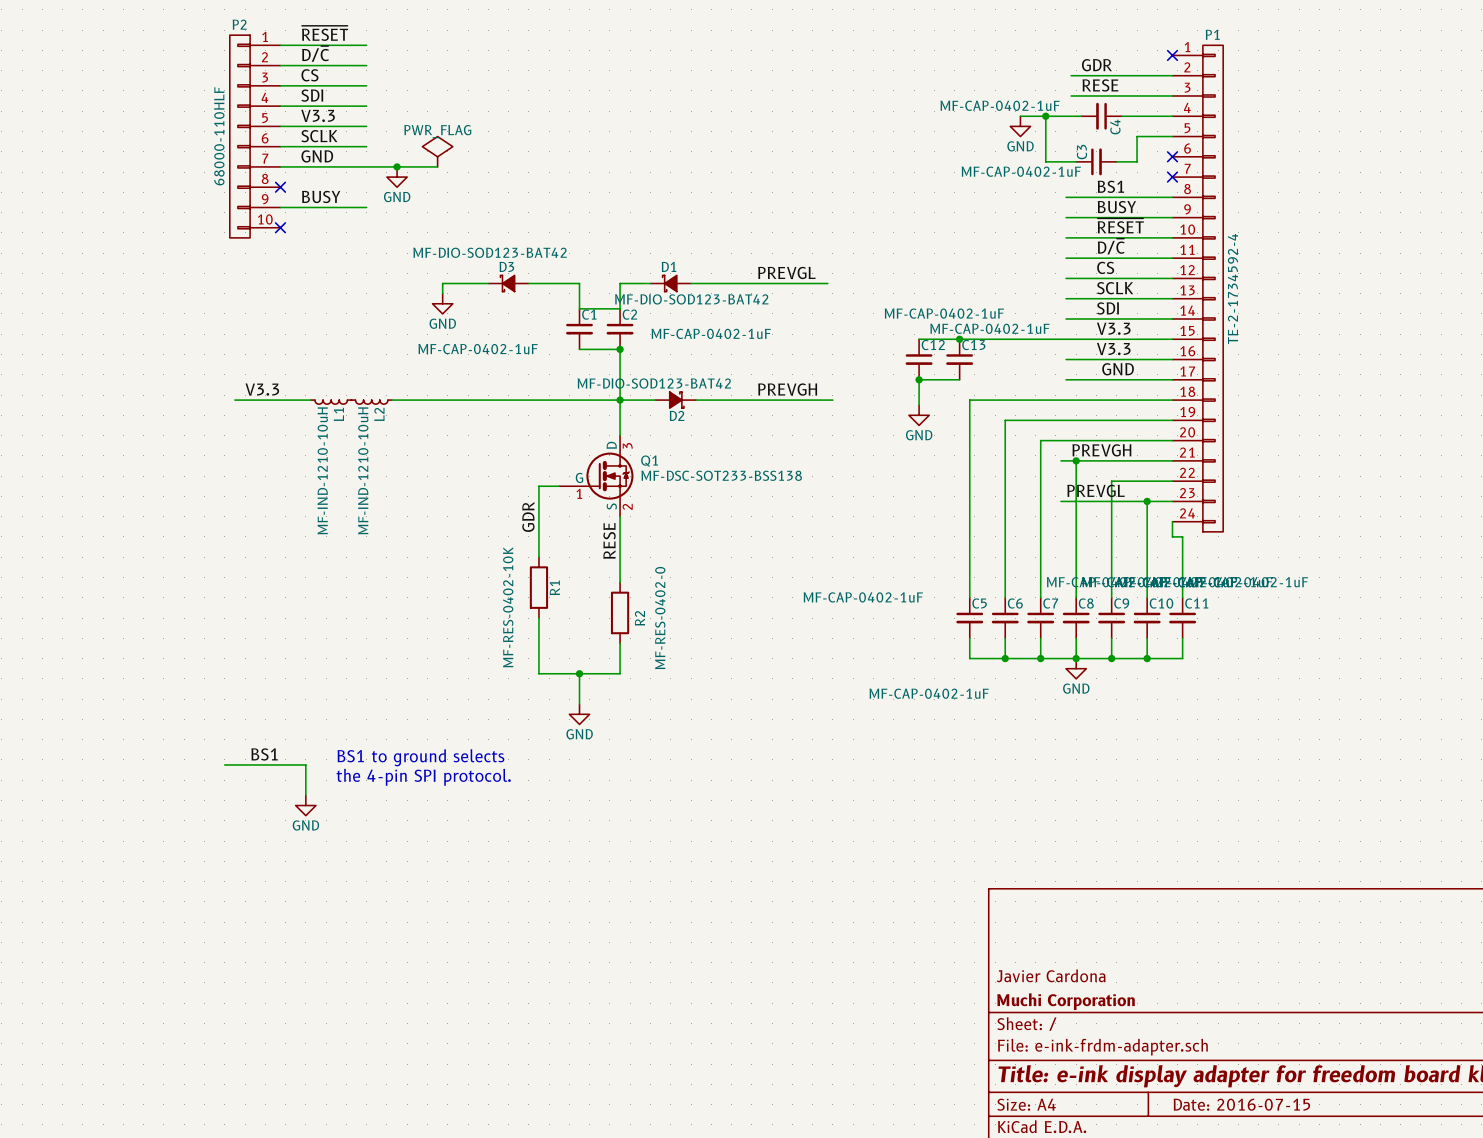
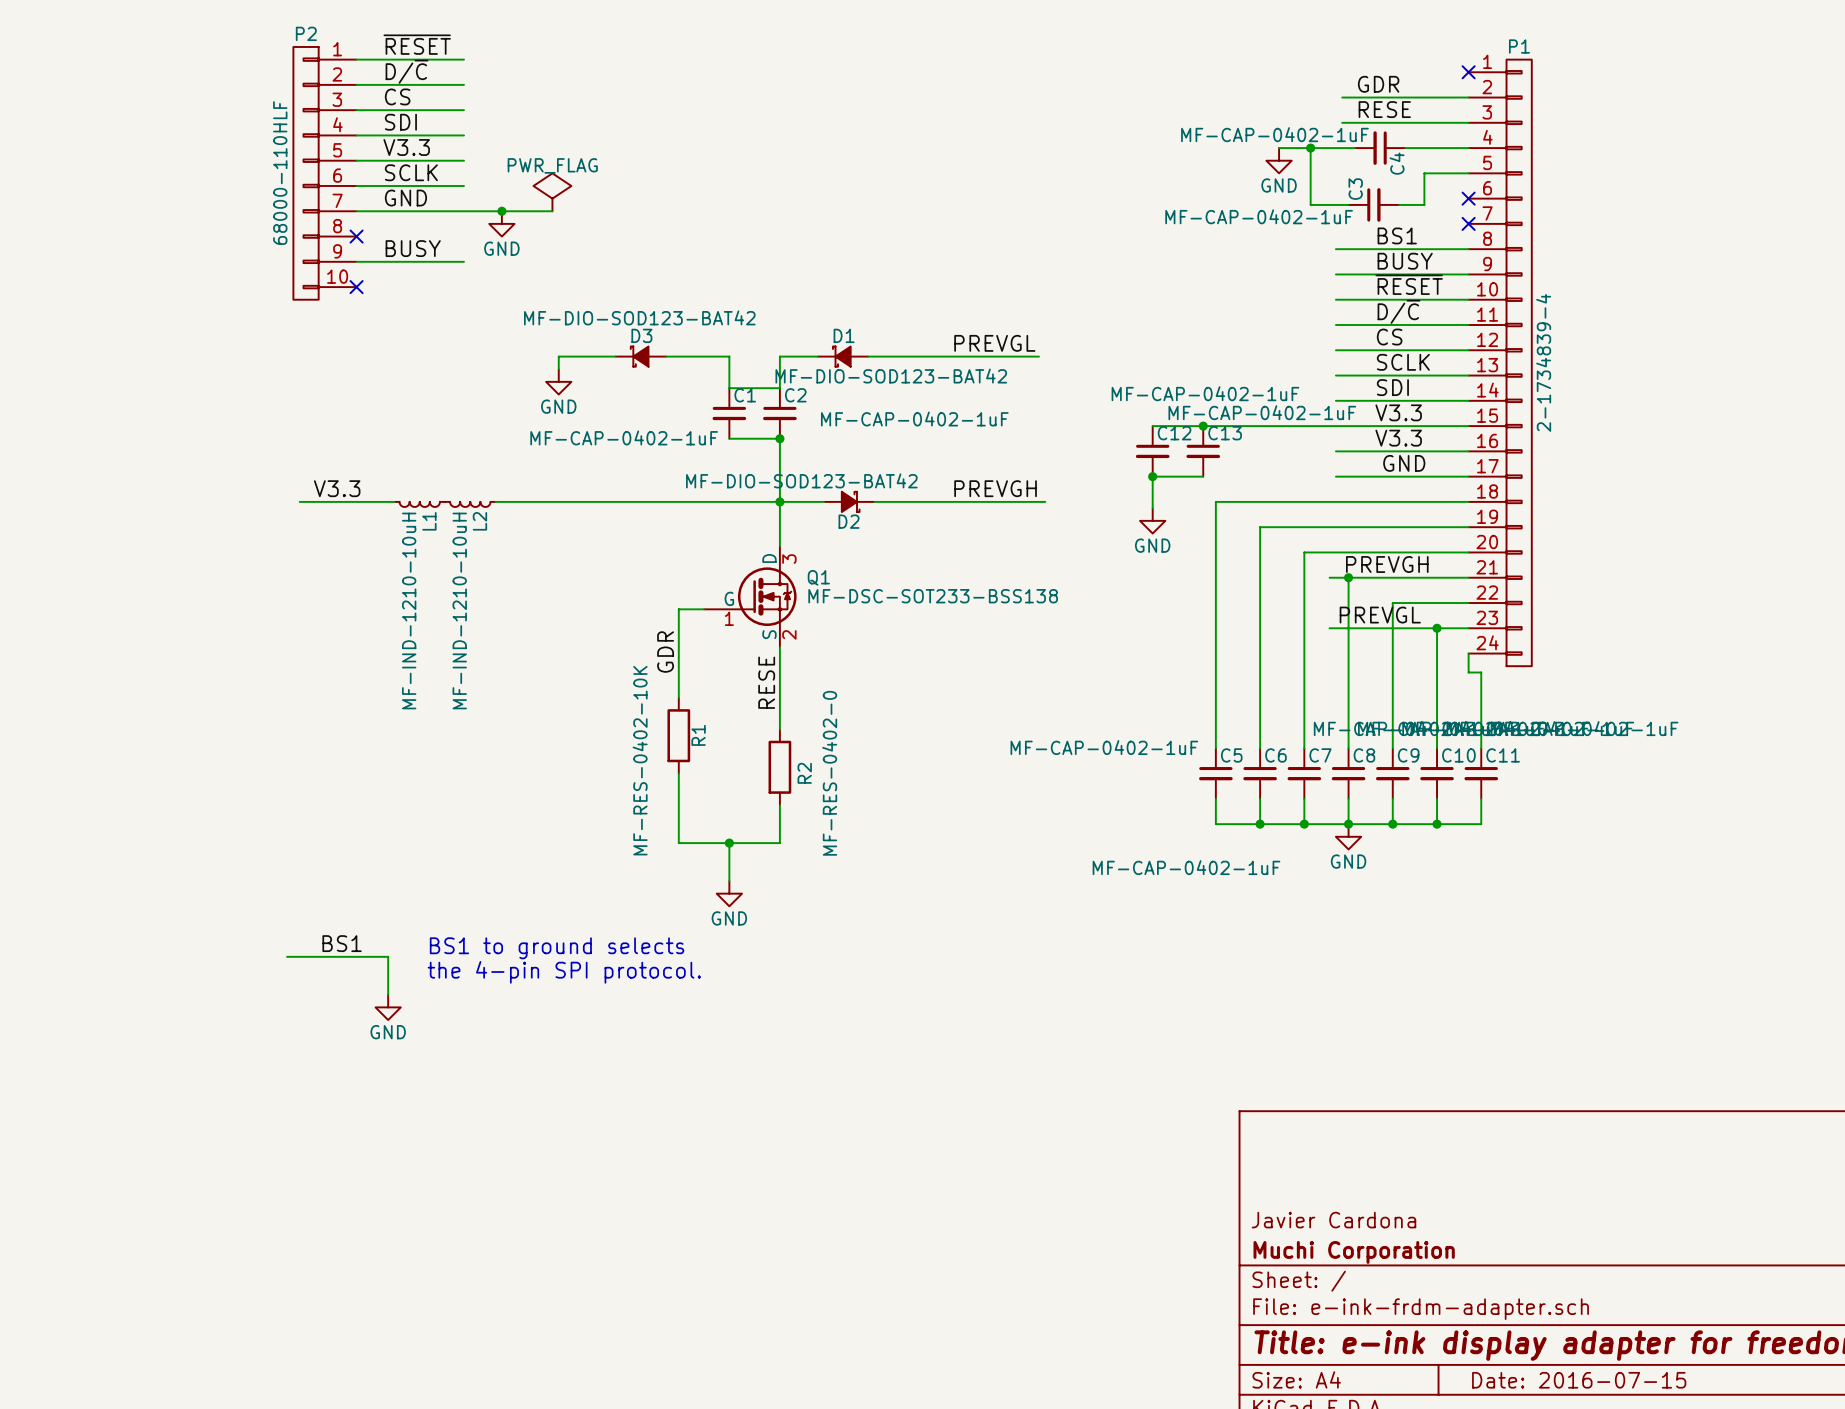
P1 value: TE-2-1734592-4 (1232, 288) -> 2-1734839-4 (1543, 362)

